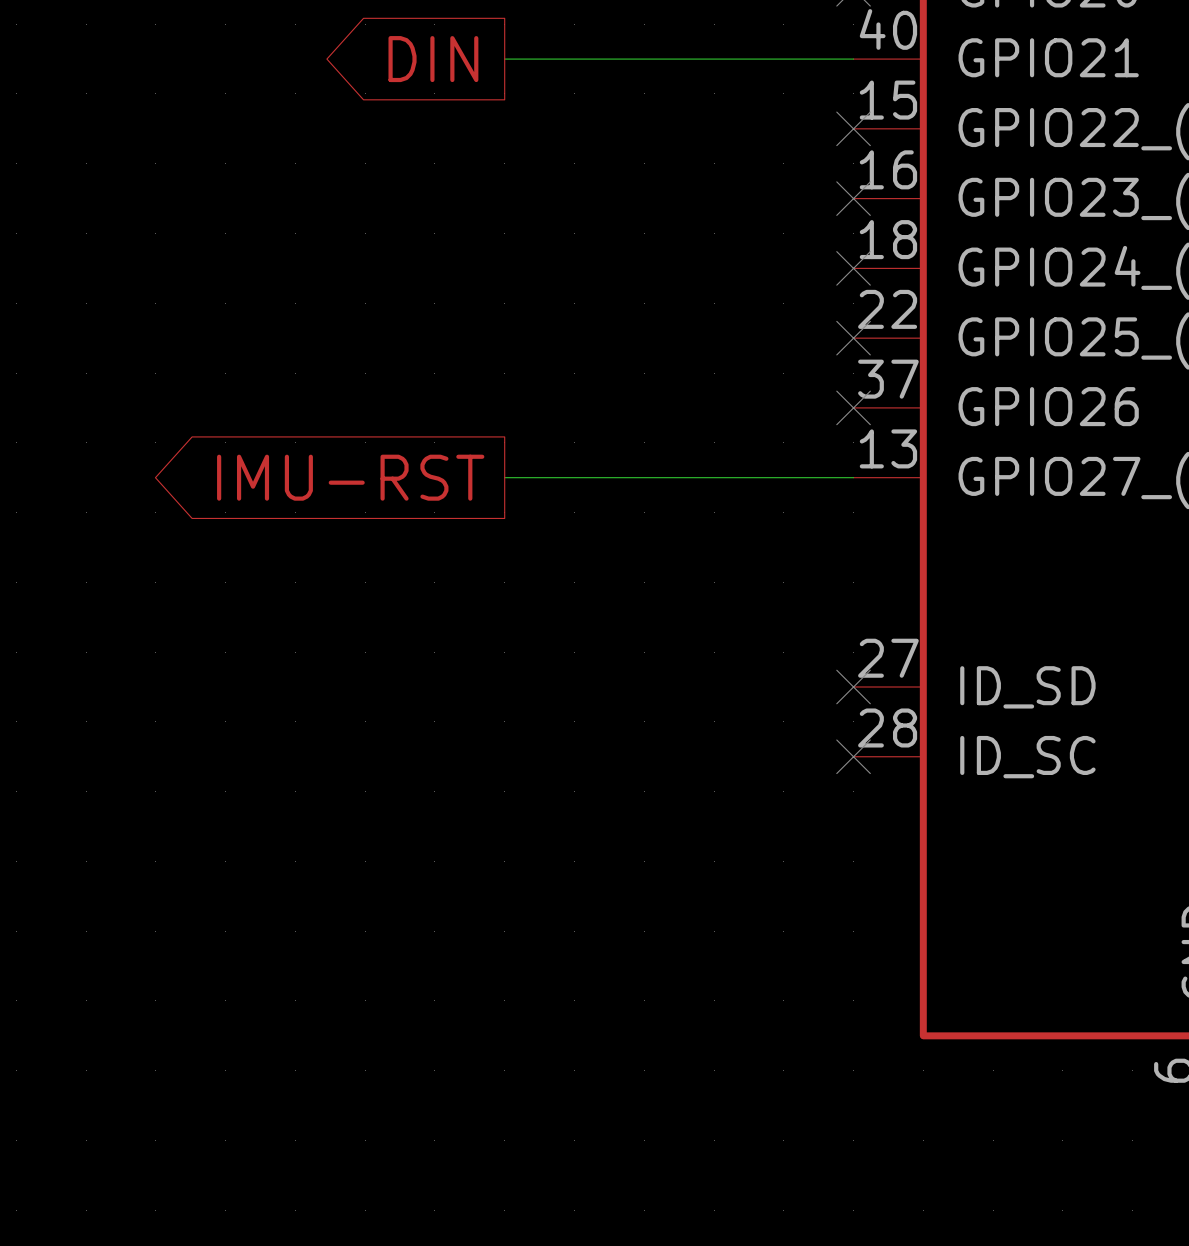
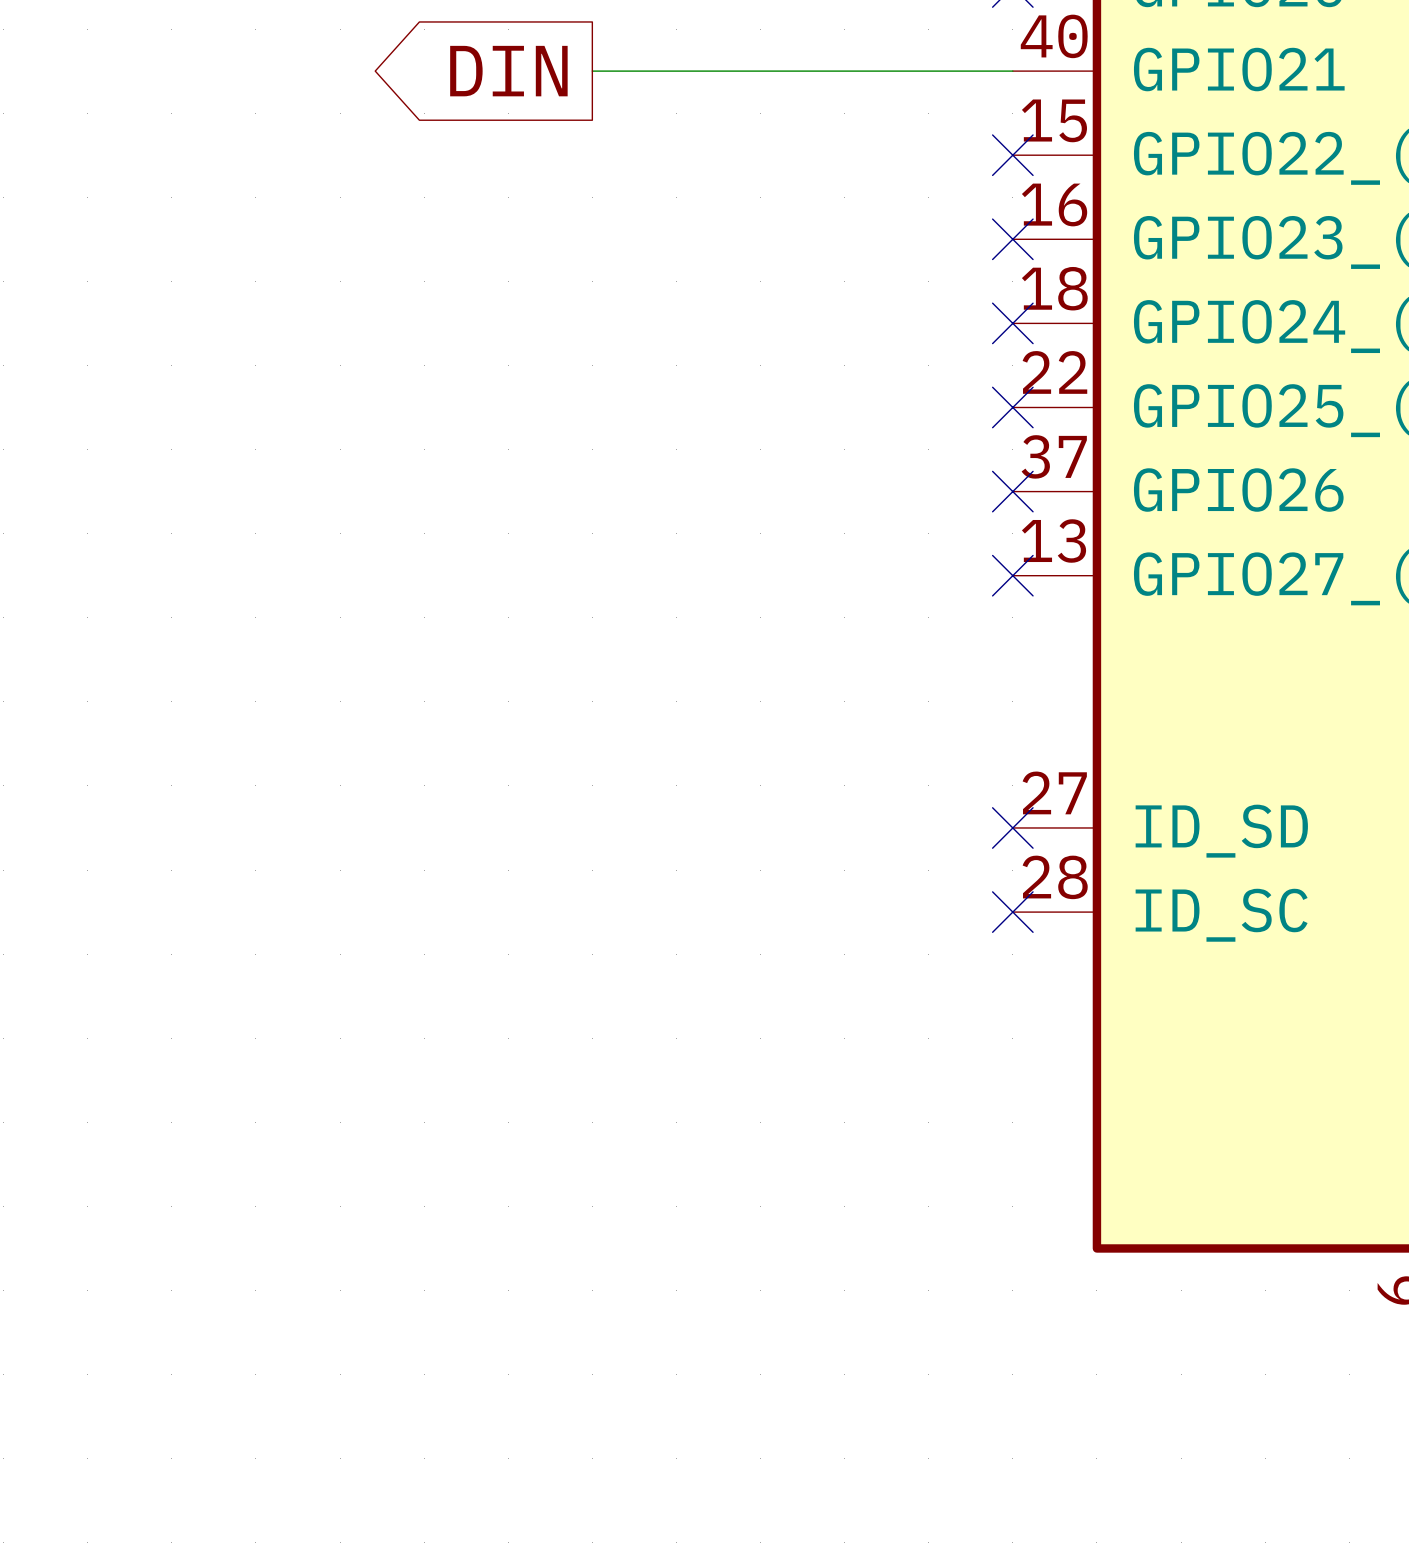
global label: IMU-RST (350, 477) -> none
wire: (504, 477) (853, 477) -> none
no-connect mark: none -> (1012, 575)

